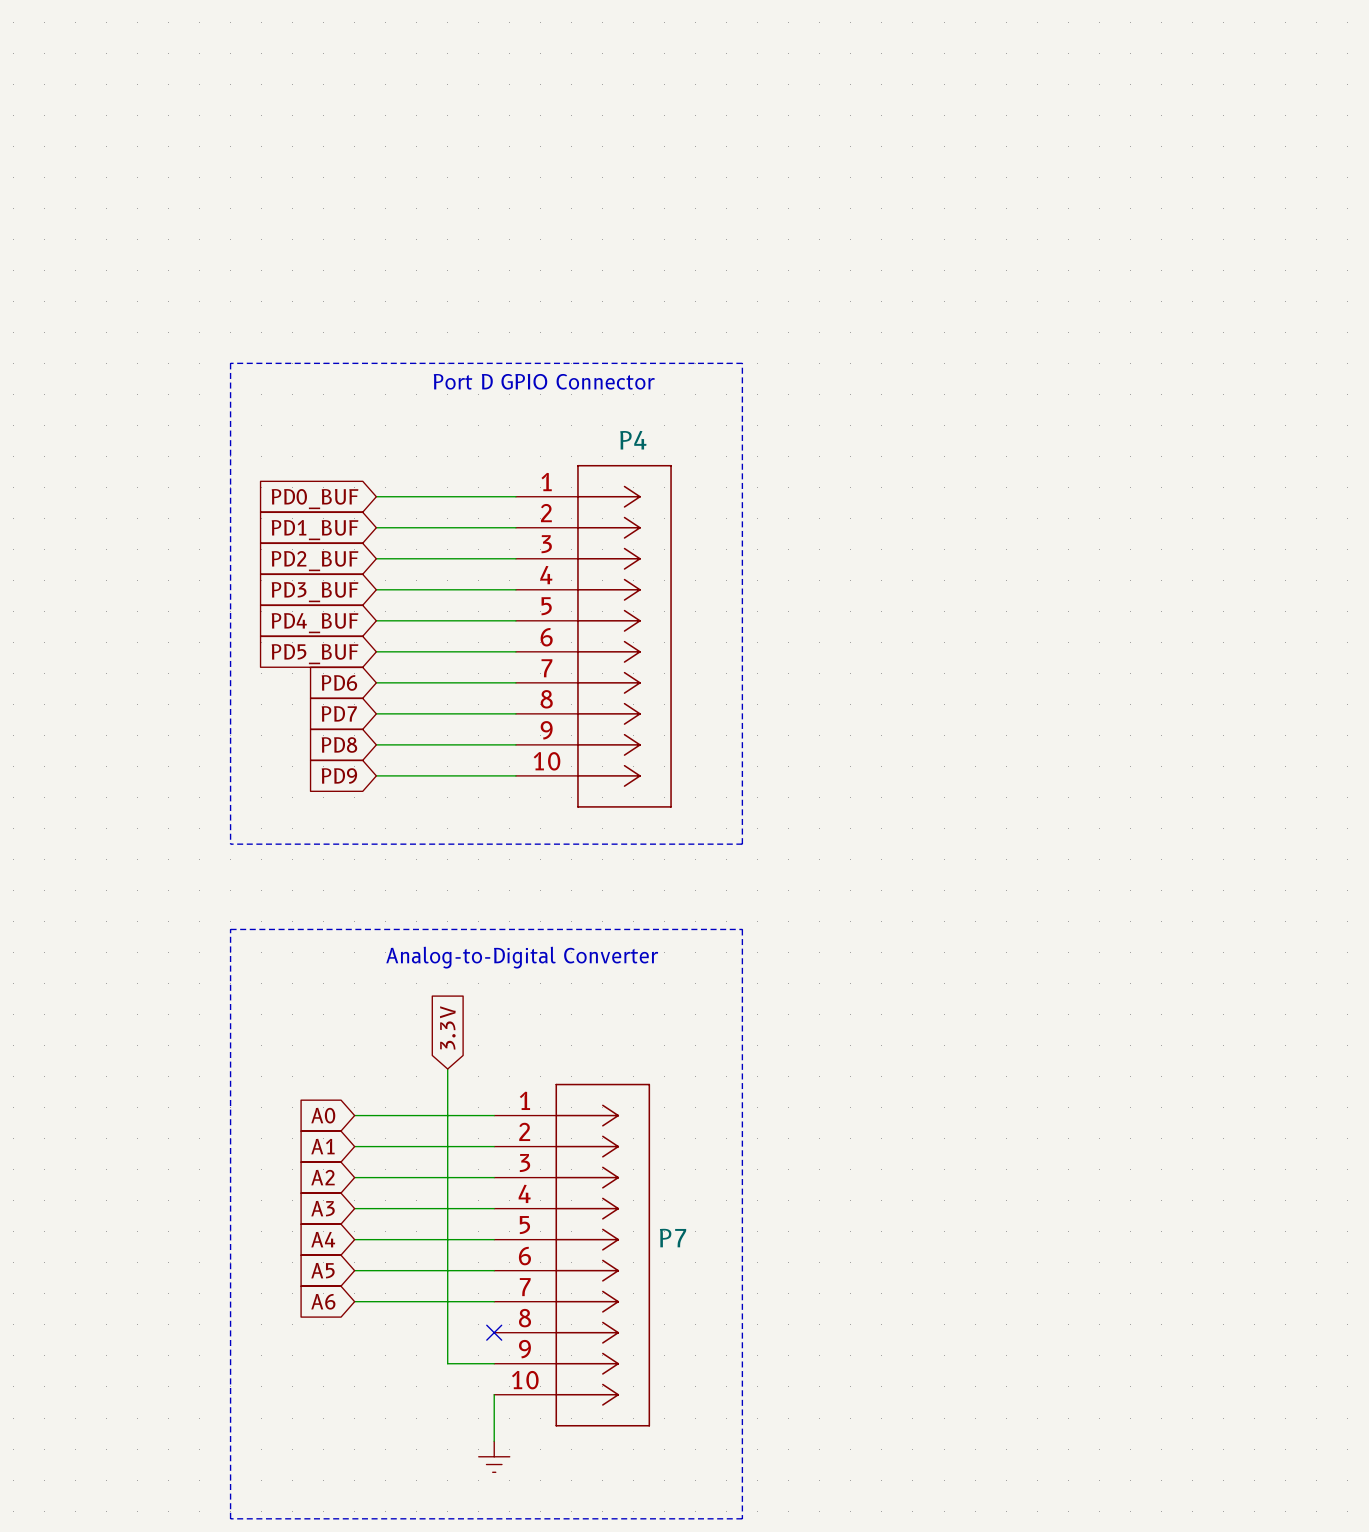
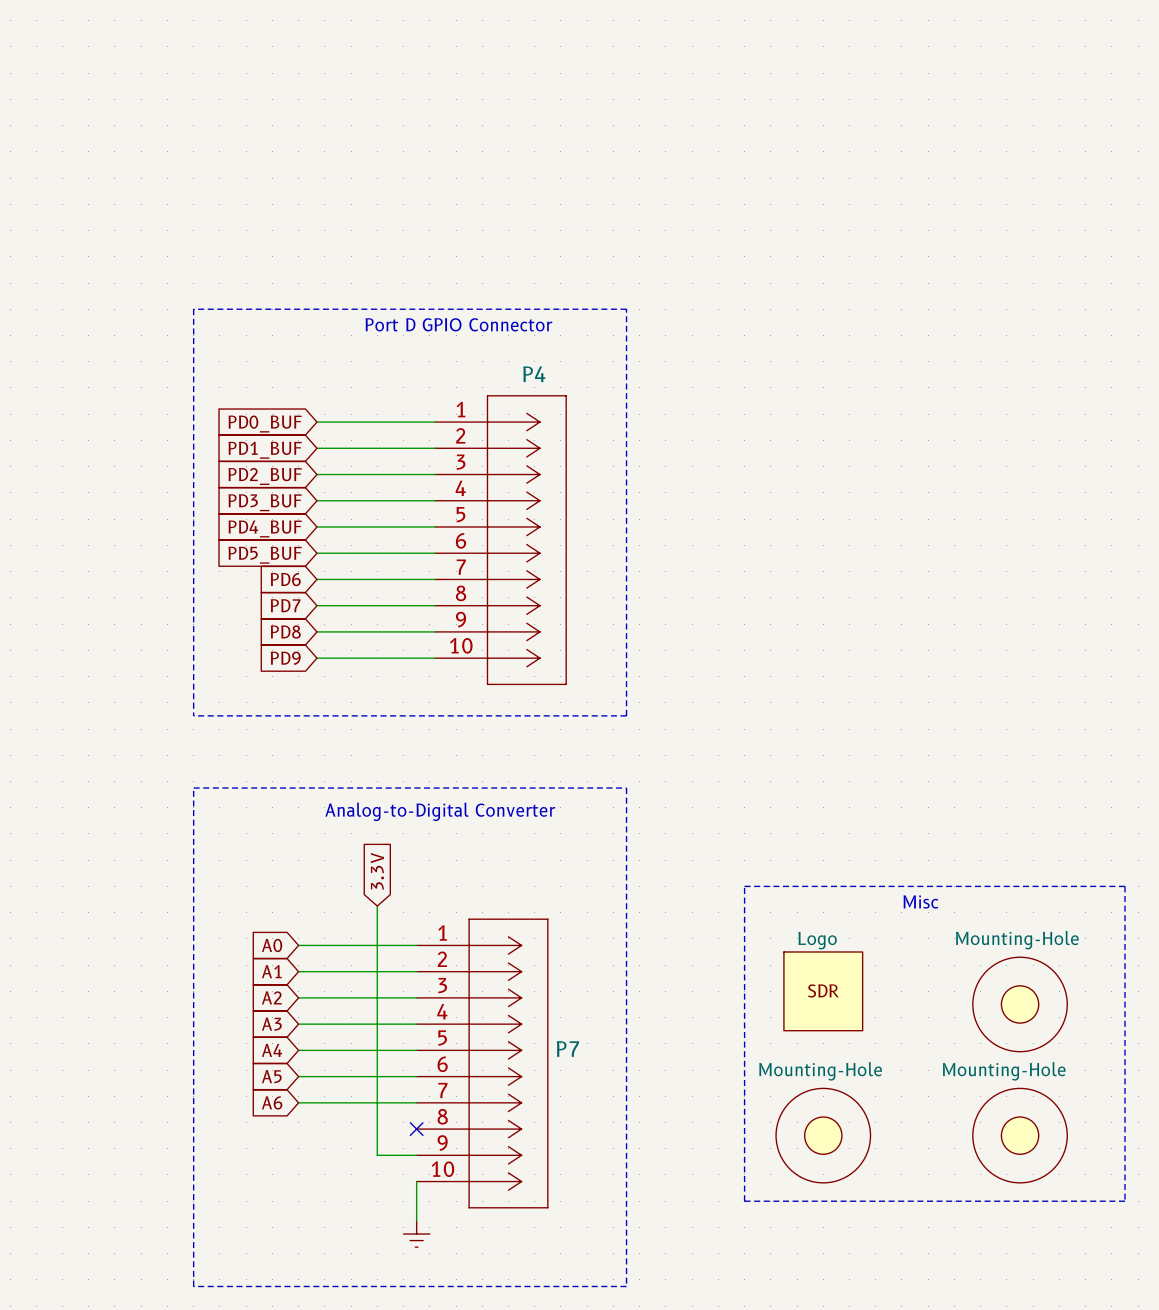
line: none -> (744, 886) (744, 1201) (1124, 1201) (1124, 886) (744, 886)
text: none -> Misc (920, 901)
part: none -> Logo (823, 991)
part: none -> Mounting-Hole (1020, 1004)
part: none -> Mounting-Hole (823, 1135)
part: none -> Mounting-Hole (1020, 1135)

